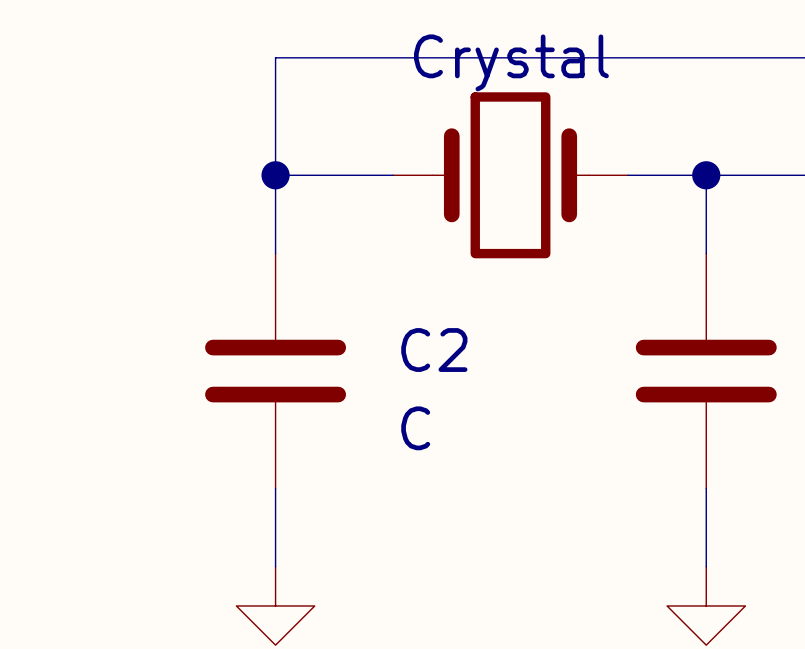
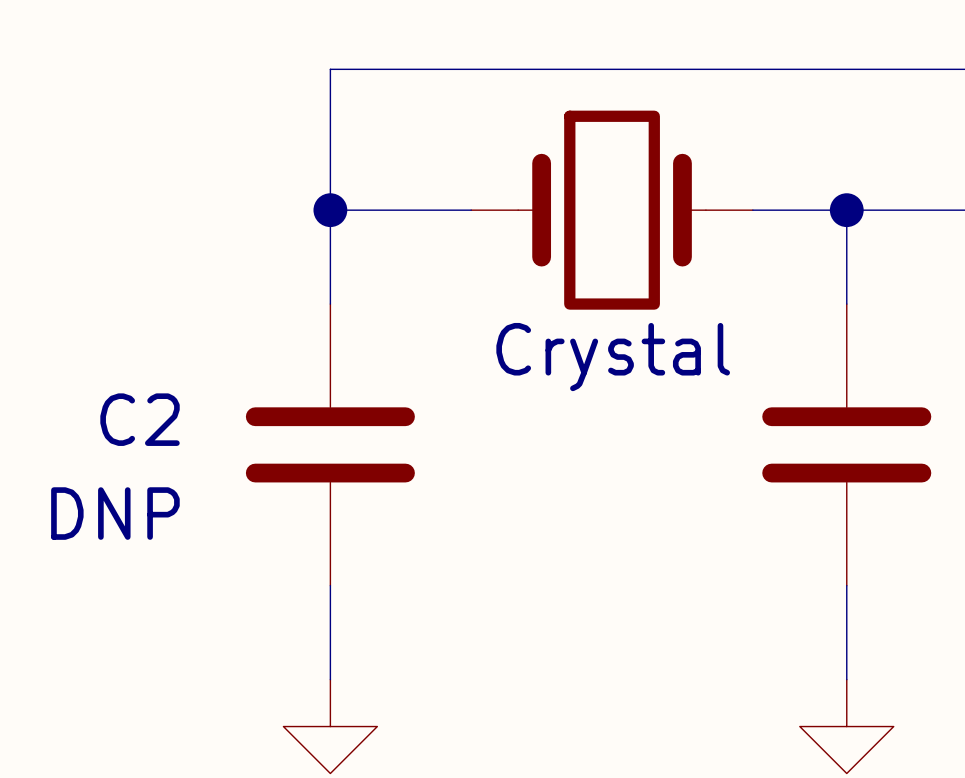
part value position: Crystal (511, 62) -> Crystal (613, 357)
C2 name position: C2 (434, 350) -> C2 (140, 419)
C2 value: C (415, 428) -> DNP (115, 513)

